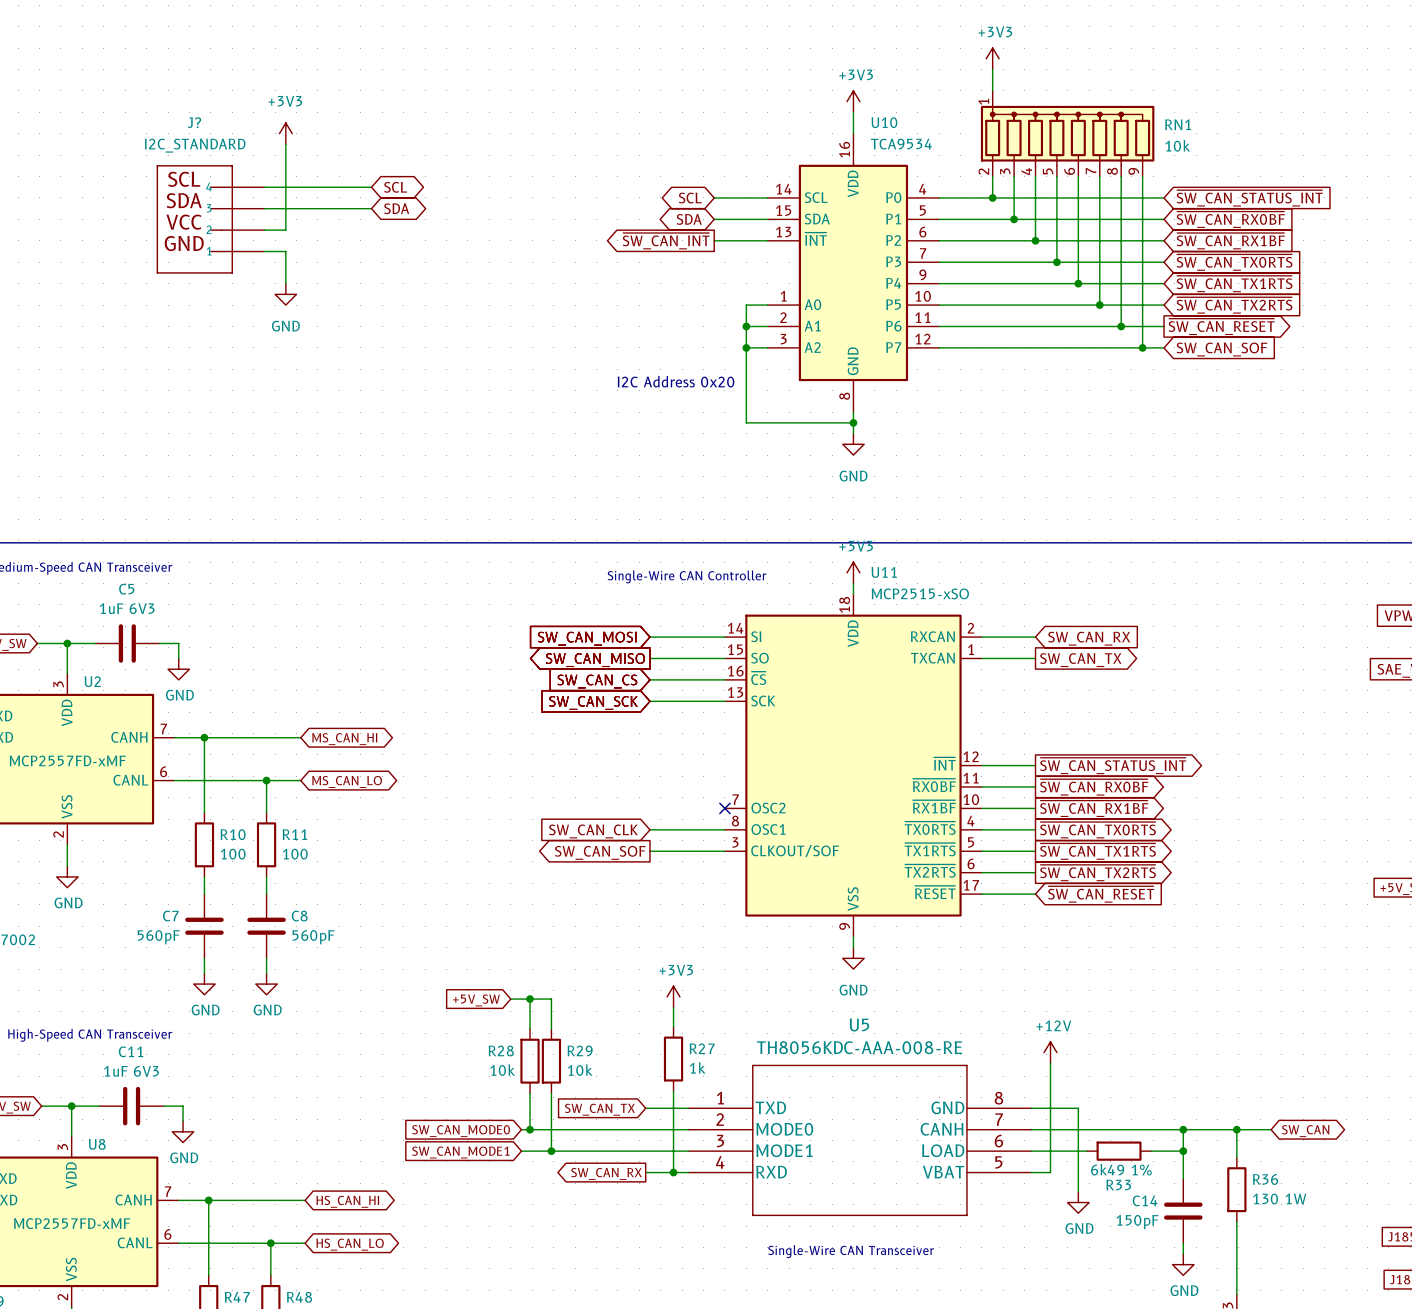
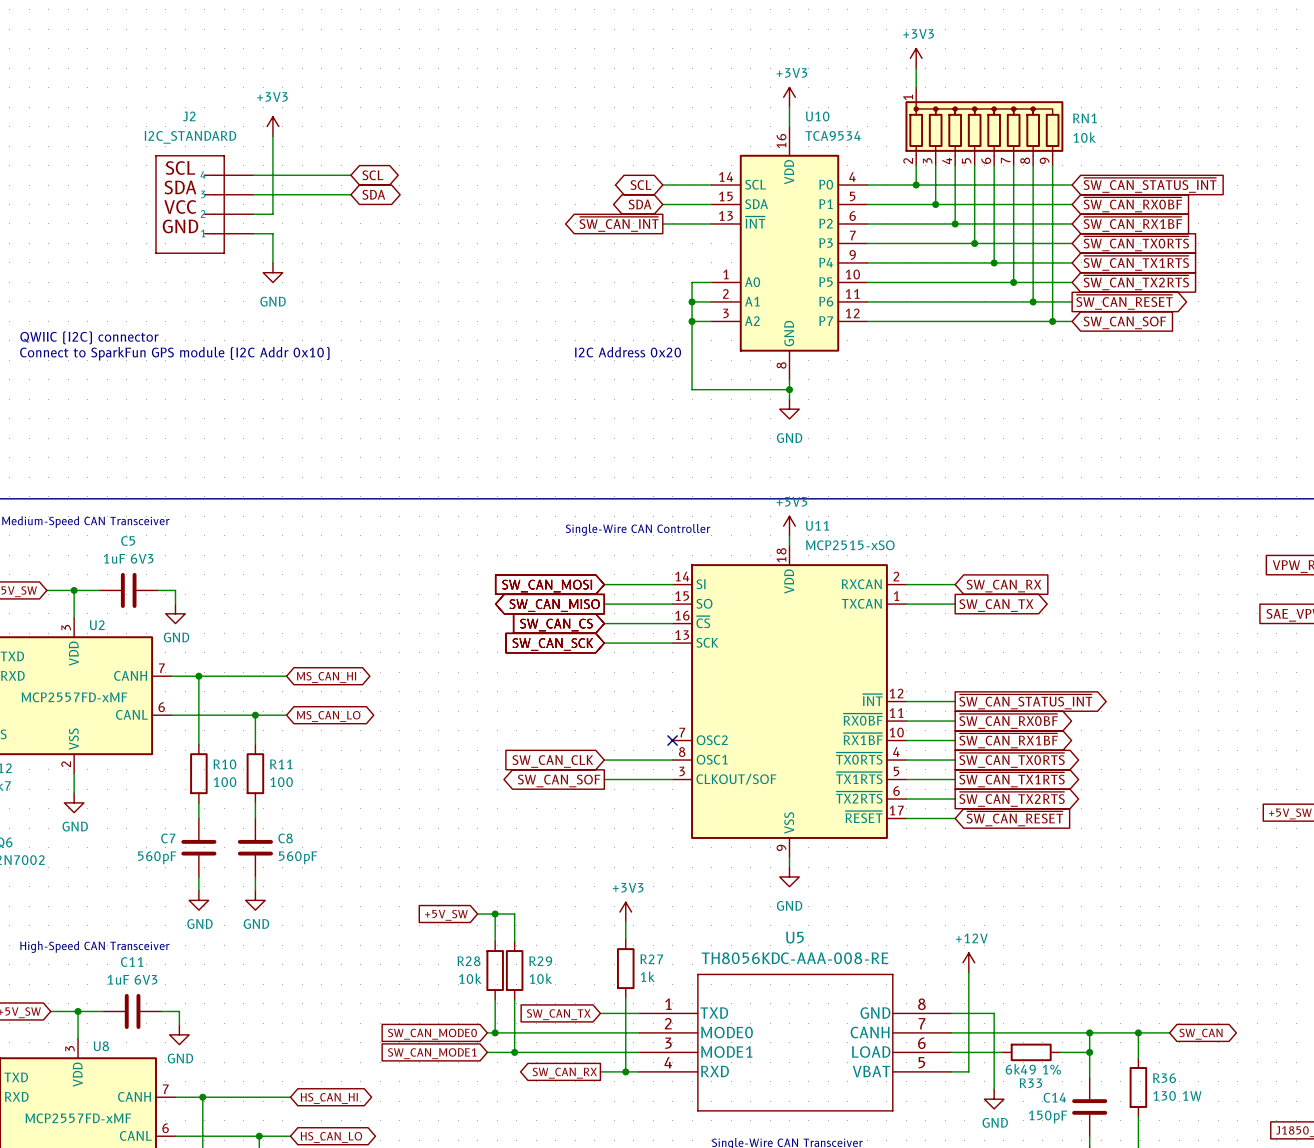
J? name: J? (194, 122) -> J2 (189, 116)
text: none -> QWIIC (I2C) connector (89, 337)
text: none -> Connect to SparkFun GPS module (I2C Addr 0x10) (174, 353)

